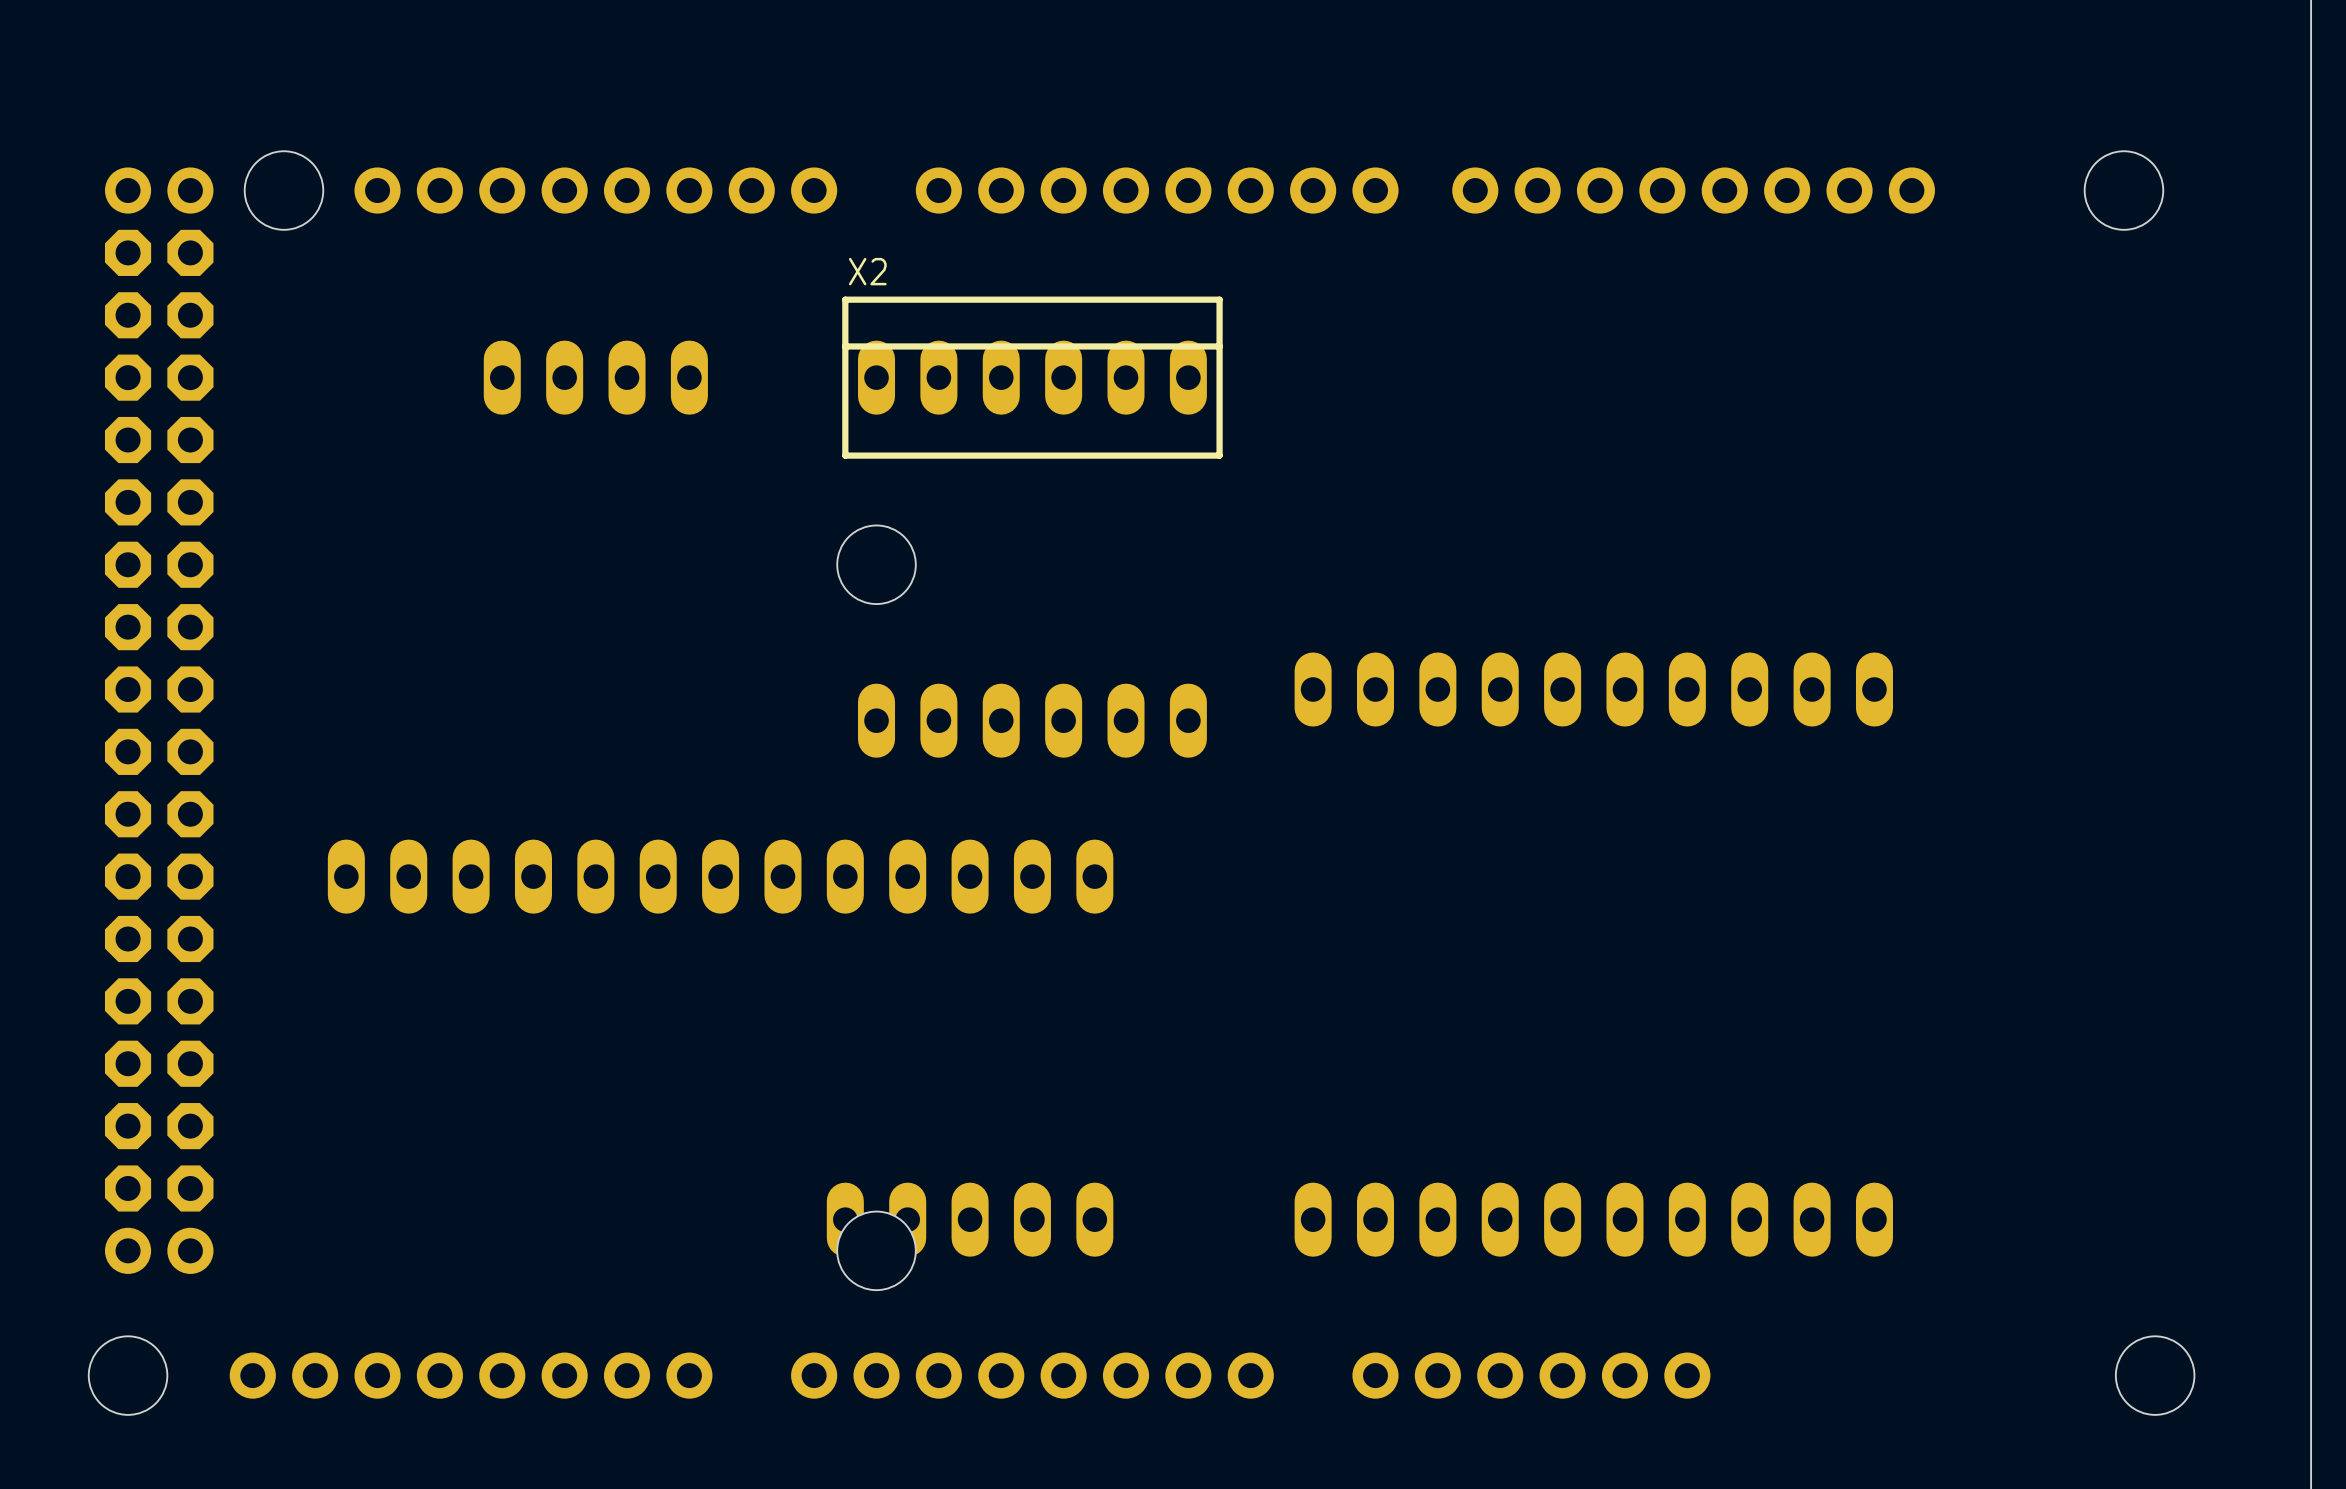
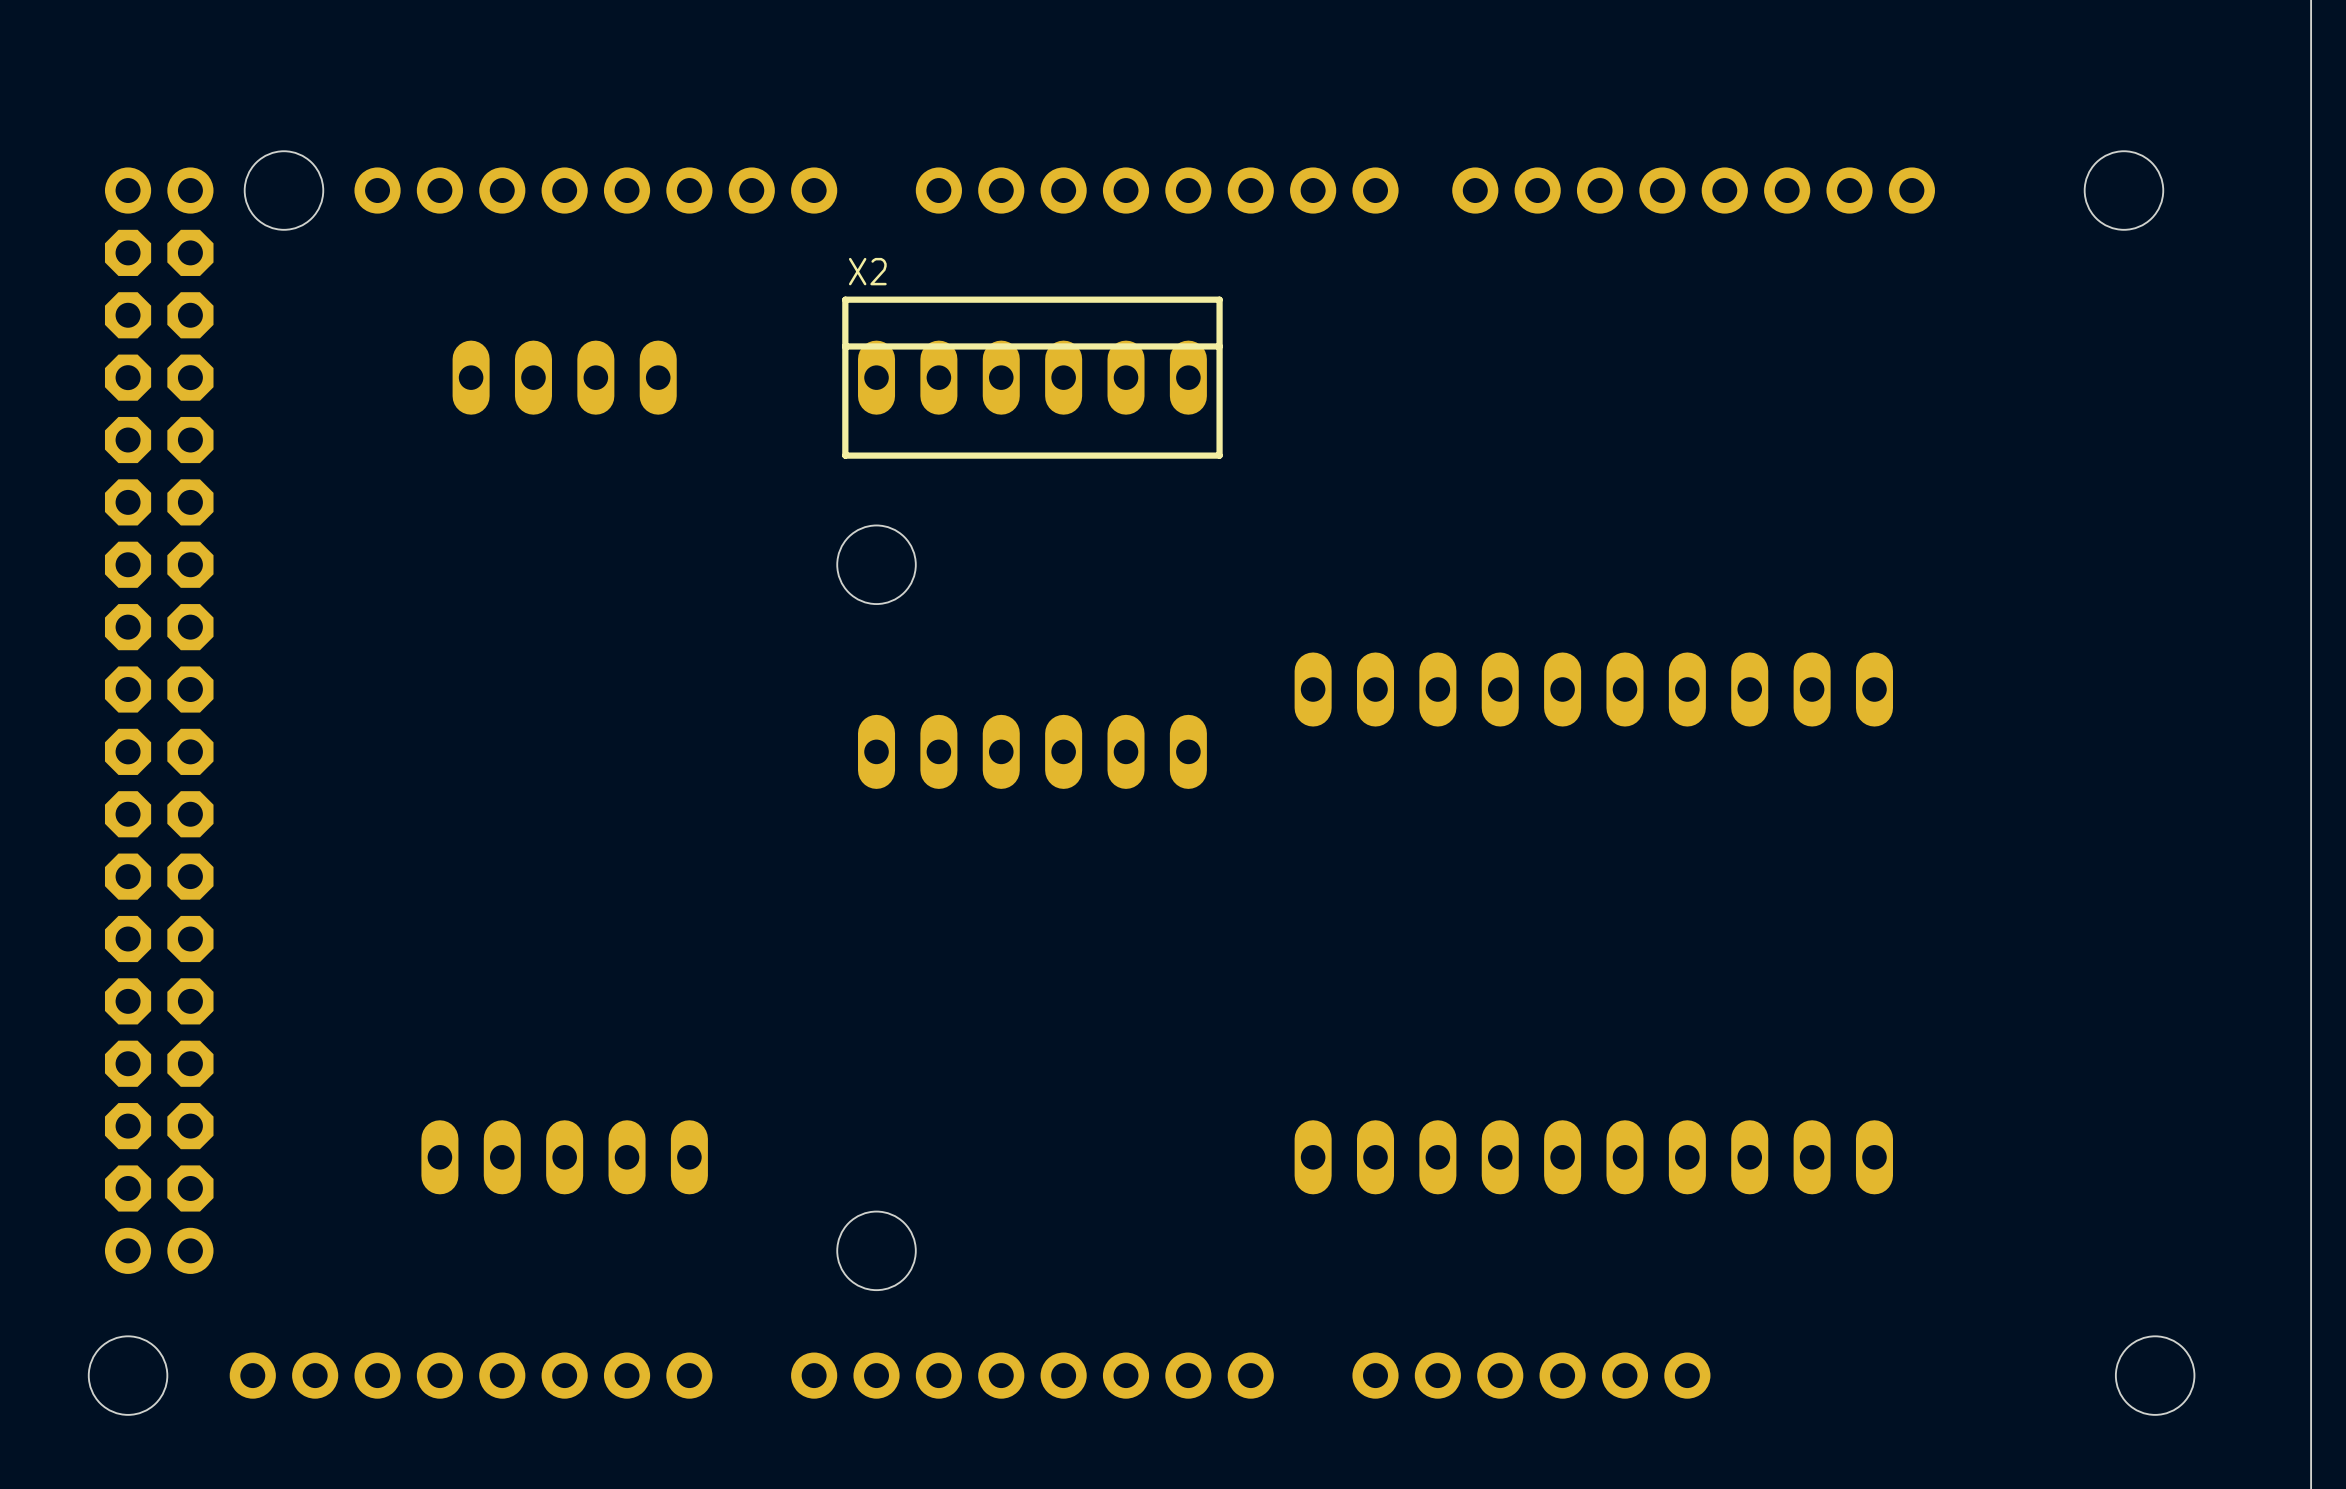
part position: (595, 377) -> (564, 377)
part position: (1032, 720) -> (1032, 751)
part: (627, 876) -> none
part: (1032, 876) -> none
part position: (970, 1219) -> (564, 1157)
part position: (1593, 1219) -> (1593, 1157)

